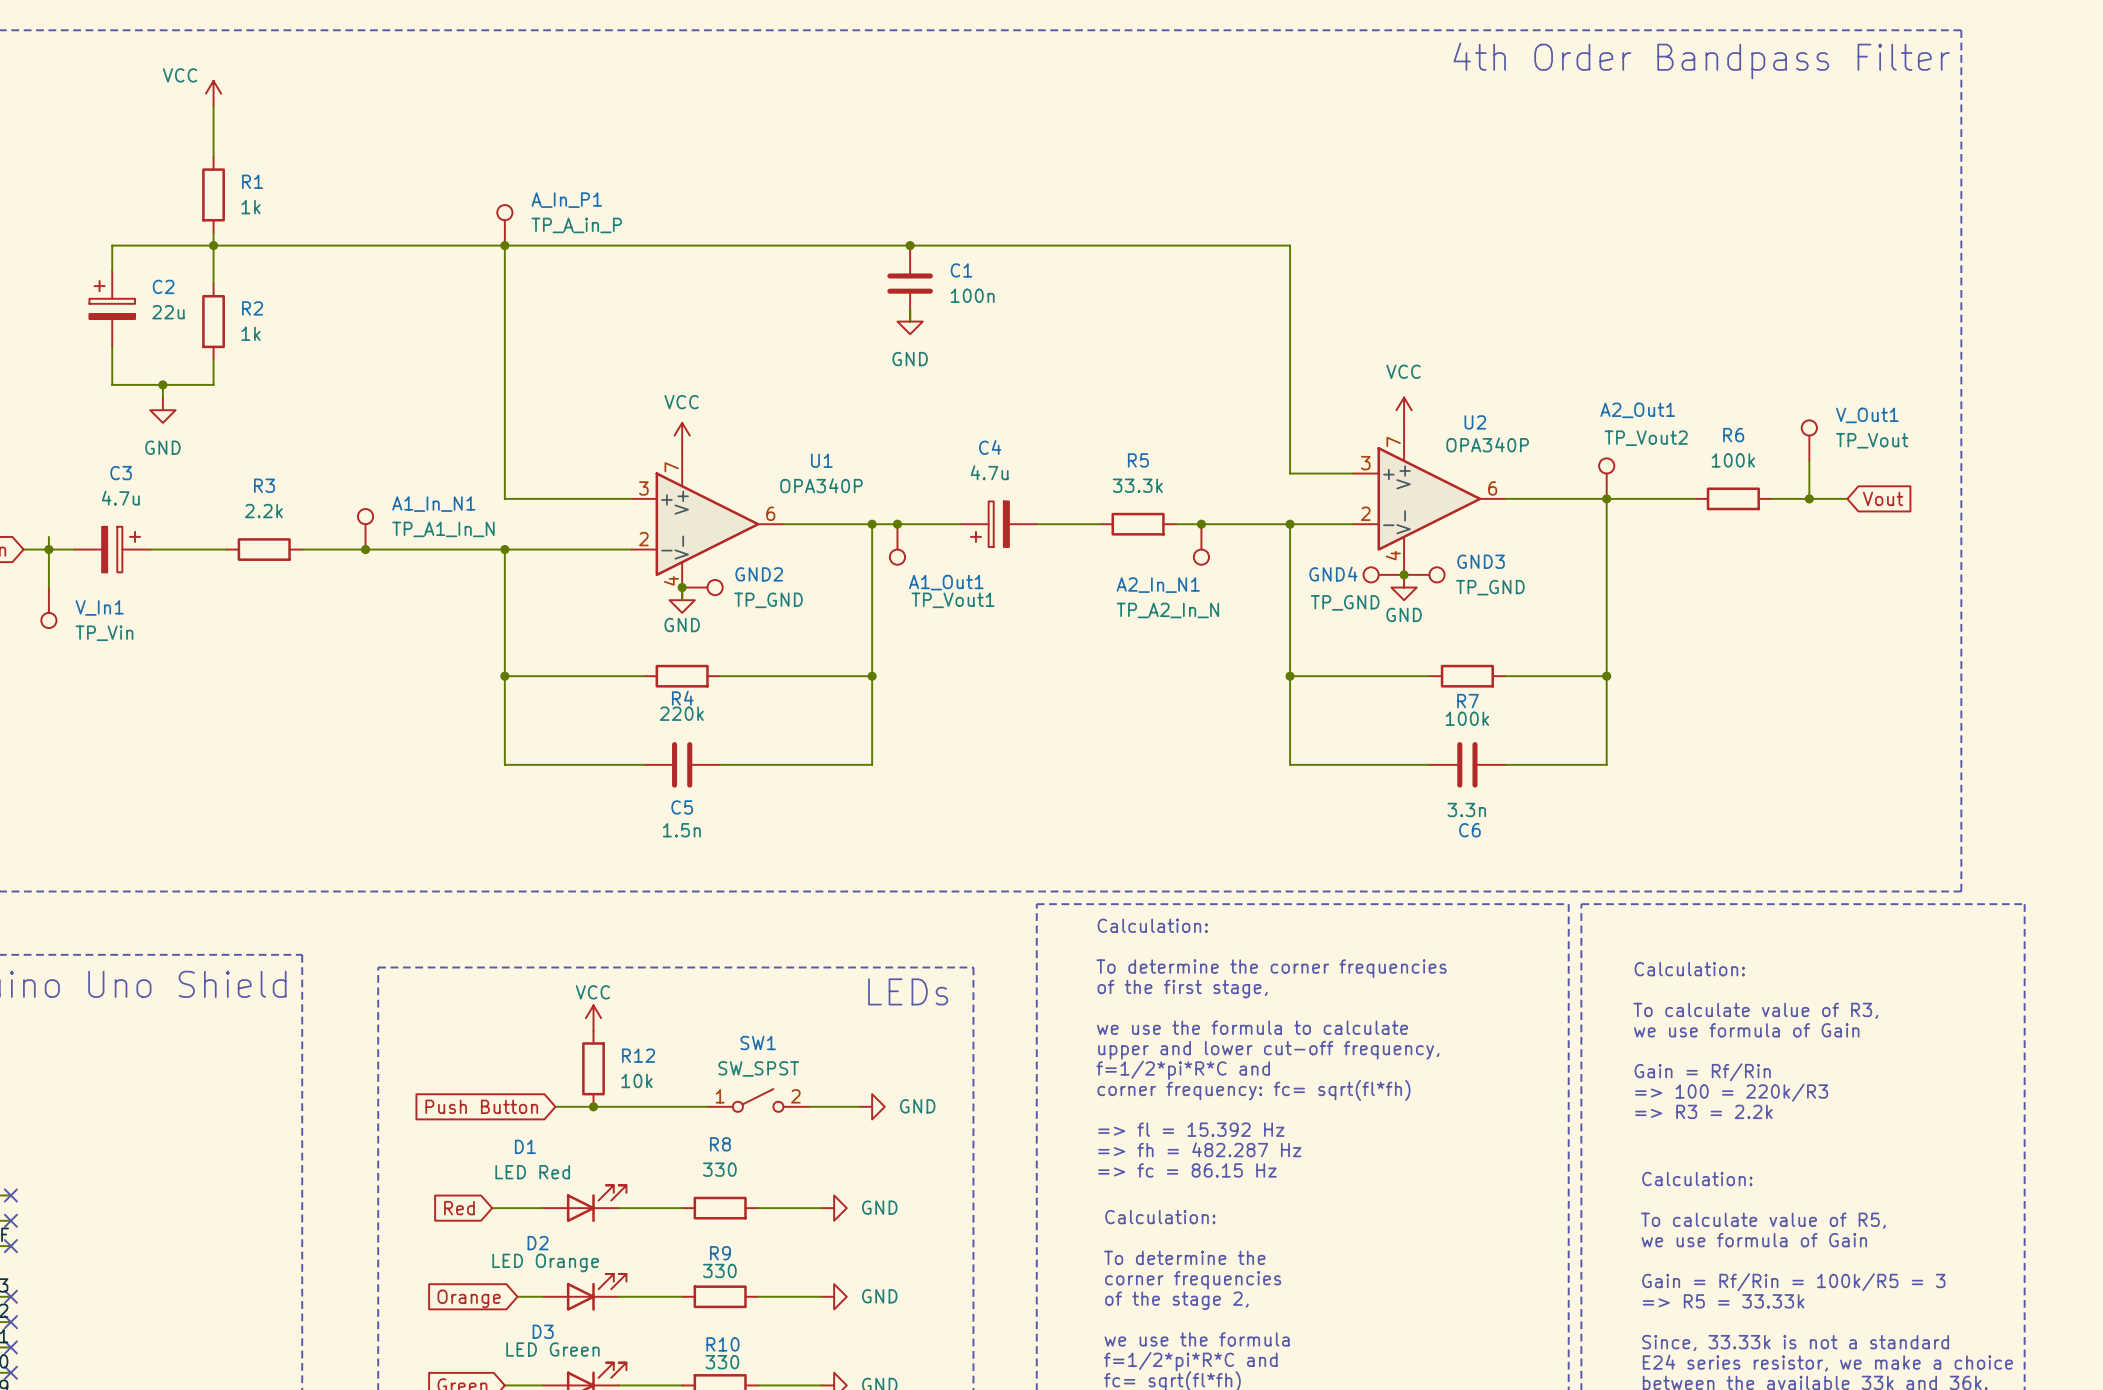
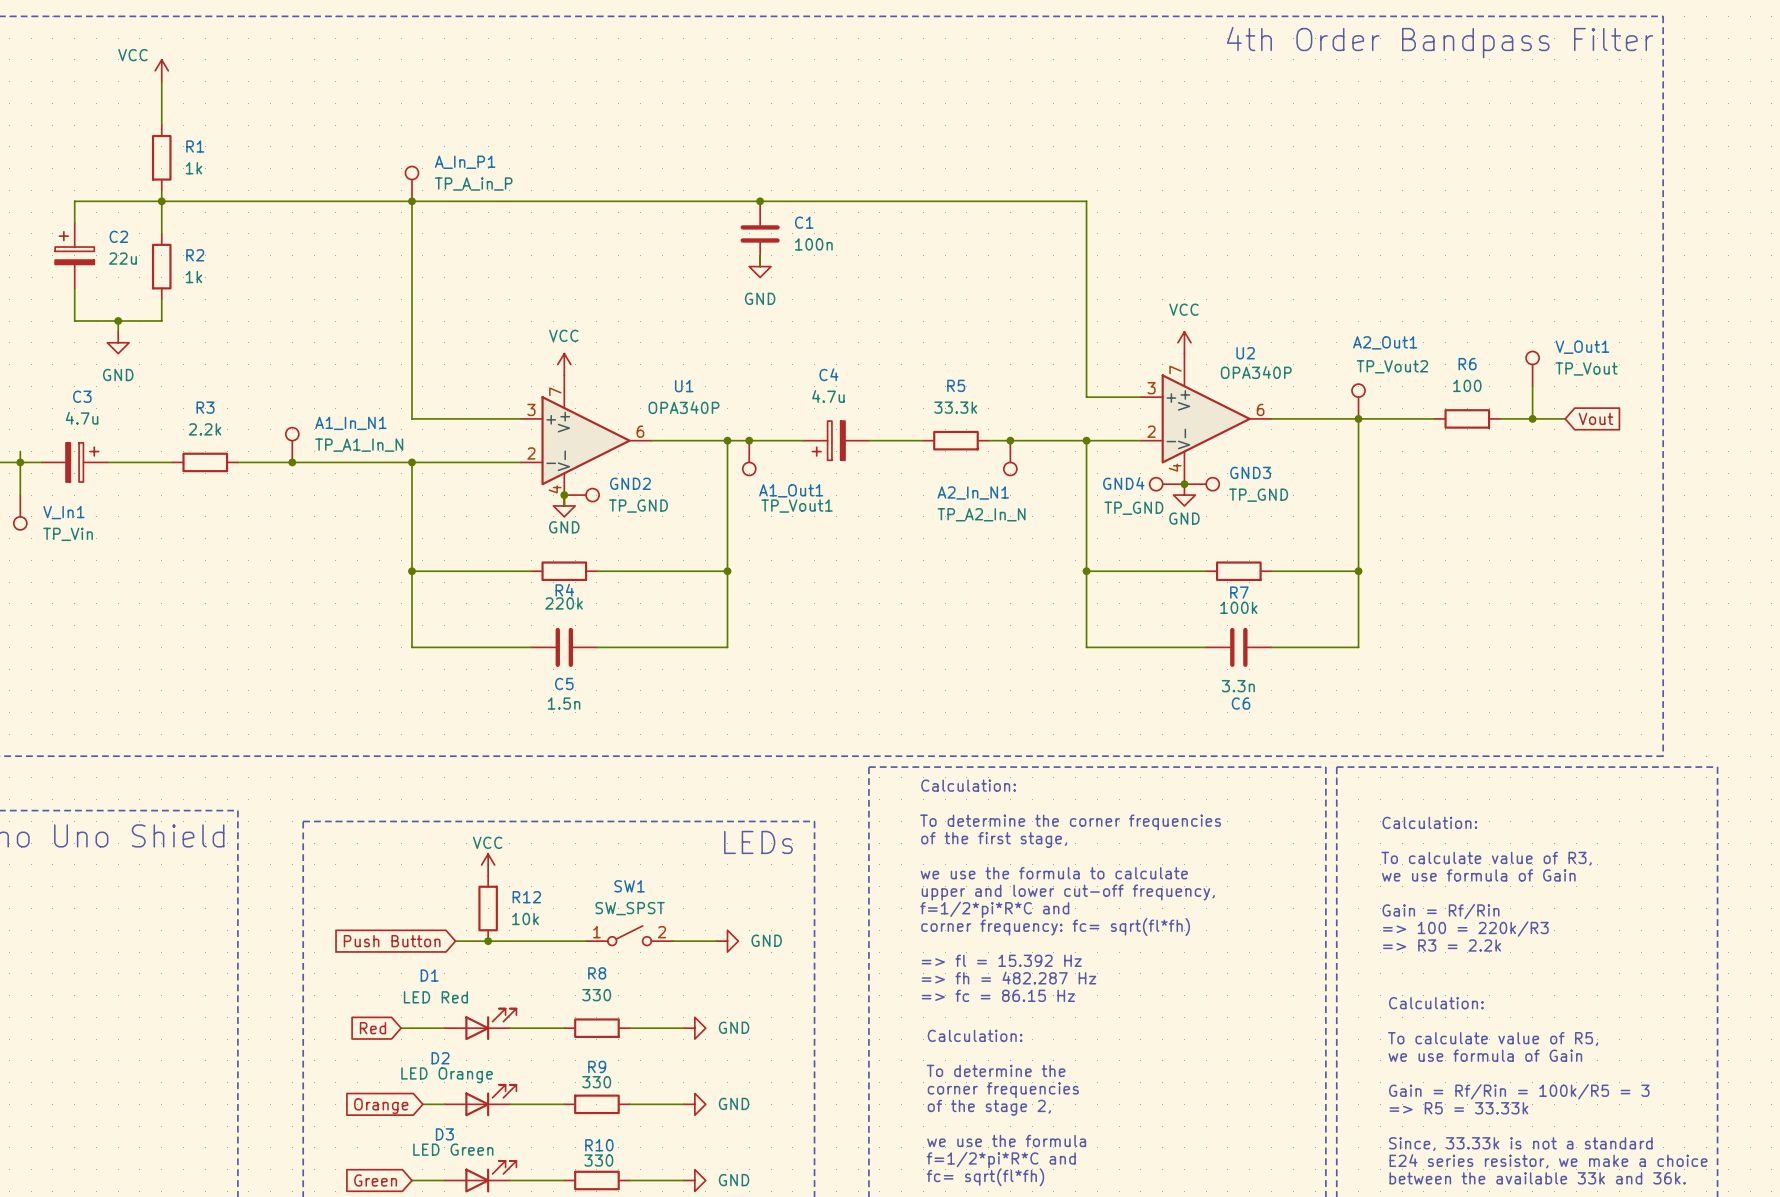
R6 value: 100k (1733, 460) -> 100 (1467, 385)

